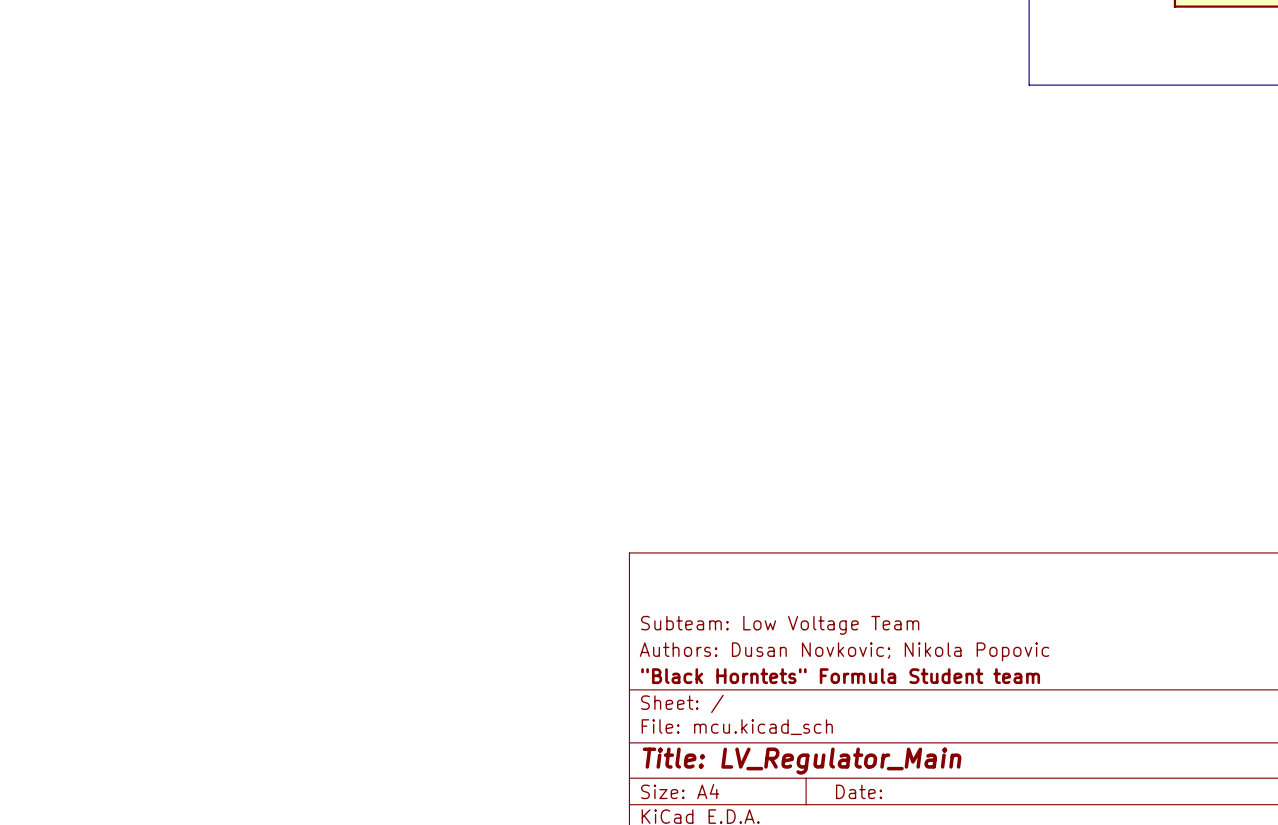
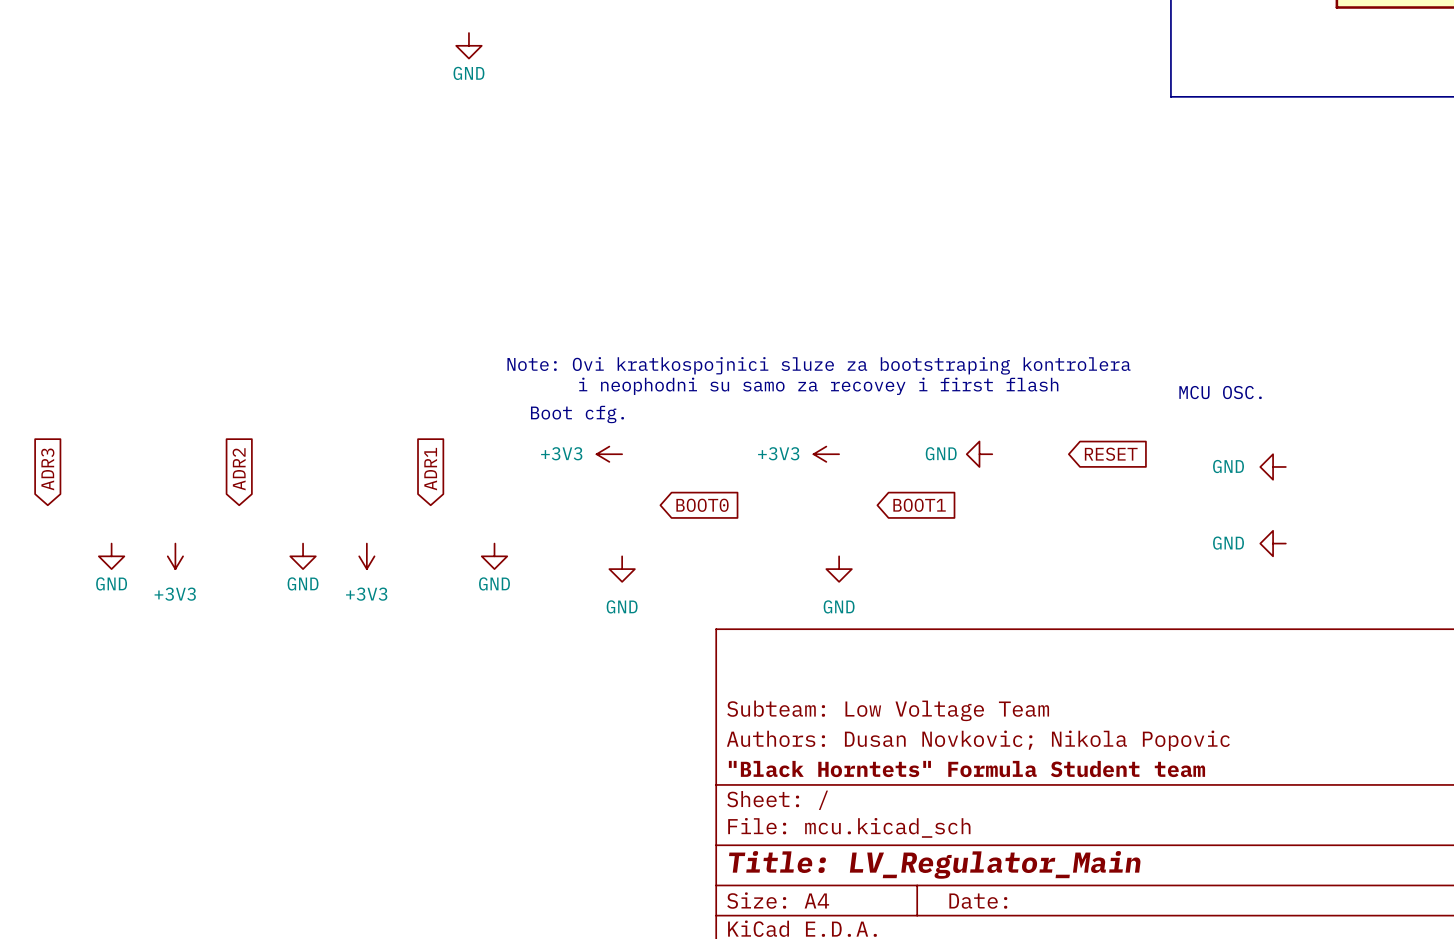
power symbol: none -> GND (468, 45)
text: none -> Note: Ovi kratkospojnici sluze za bootstraping kontrolera (818, 365)
text: none -> i neophodni su samo za recovey i first flash (818, 386)
text: none -> MCU OSC. (1220, 392)
text: none -> Boot cfg. (577, 414)
power symbol: none -> +3V3 (609, 454)
power symbol: none -> +3V3 (826, 454)
power symbol: none -> GND (979, 454)
global label: none -> RESET (1111, 454)
global label: none -> ADR3 (47, 469)
global label: none -> ADR2 (239, 469)
global label: none -> ADR1 (430, 469)
power symbol: none -> GND (1273, 466)
global label: none -> BOOT0 (702, 505)
global label: none -> BOOT1 (919, 505)
power symbol: none -> GND (1273, 543)
power symbol: none -> GND (111, 556)
power symbol: none -> +3V3 (175, 556)
power symbol: none -> GND (303, 556)
power symbol: none -> +3V3 (366, 556)
power symbol: none -> GND (494, 556)
power symbol: none -> GND (622, 569)
power symbol: none -> GND (839, 569)

